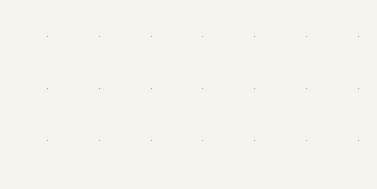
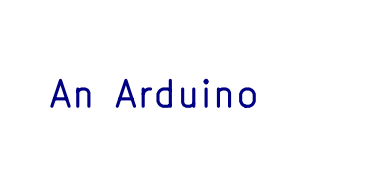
text: none -> An Arduino (153, 93)

